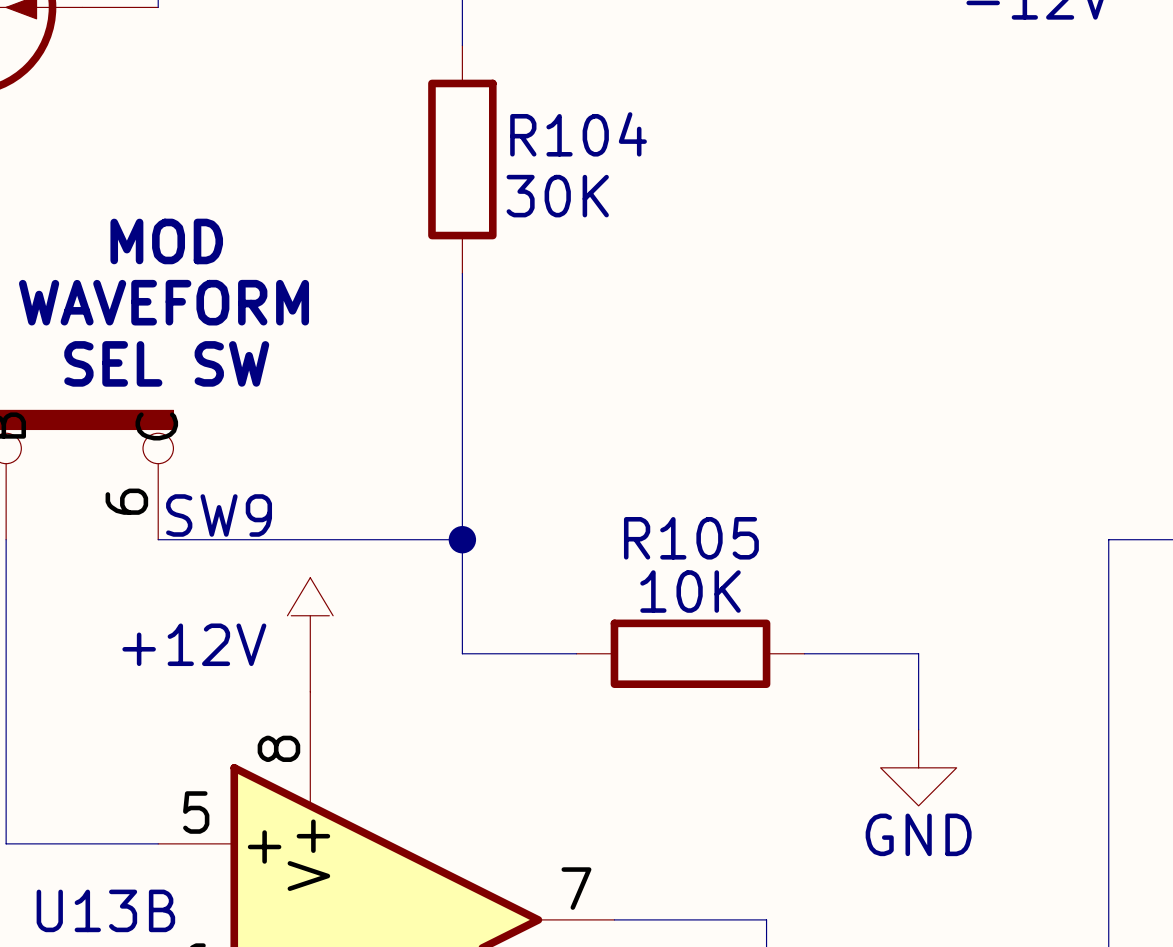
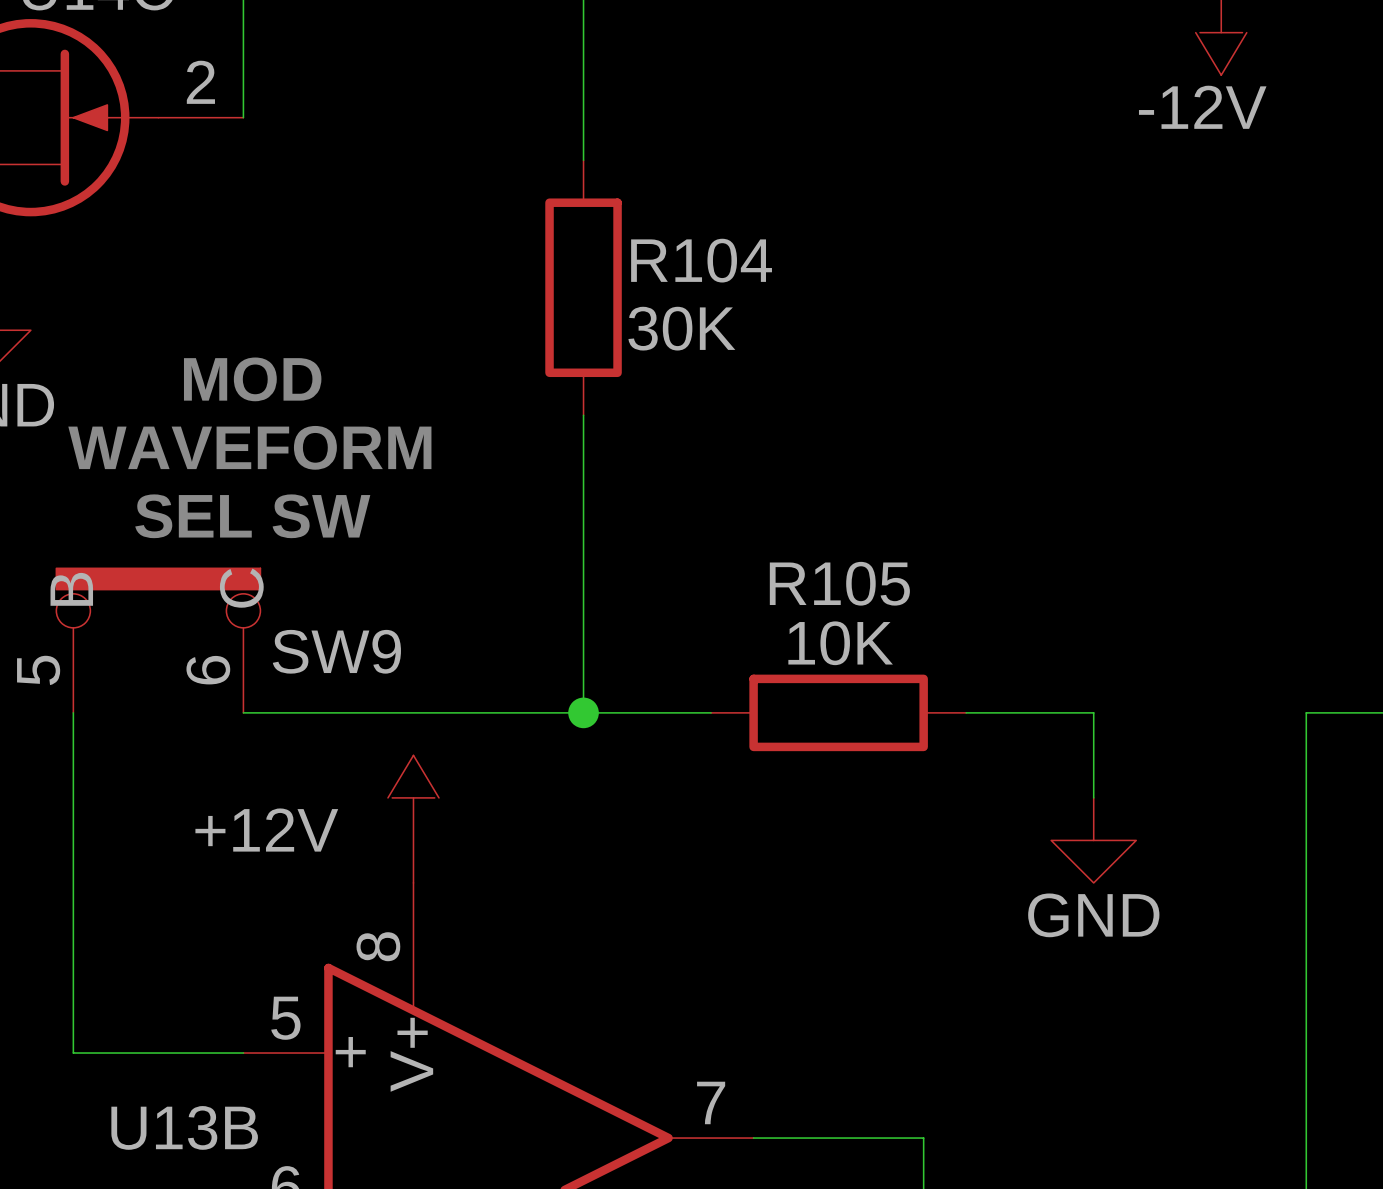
SW9 name position: SW9 (219, 515) -> SW9 (336, 651)
wire: (462, 539) (462, 653) (576, 653) -> (583, 712) (711, 712)
R105 position: (690, 653) -> (838, 712)
wire: (804, 653) (918, 653) (918, 729) -> (966, 712) (1093, 712) (1093, 797)
power symbol position: GND (918, 767) -> GND (1093, 840)

